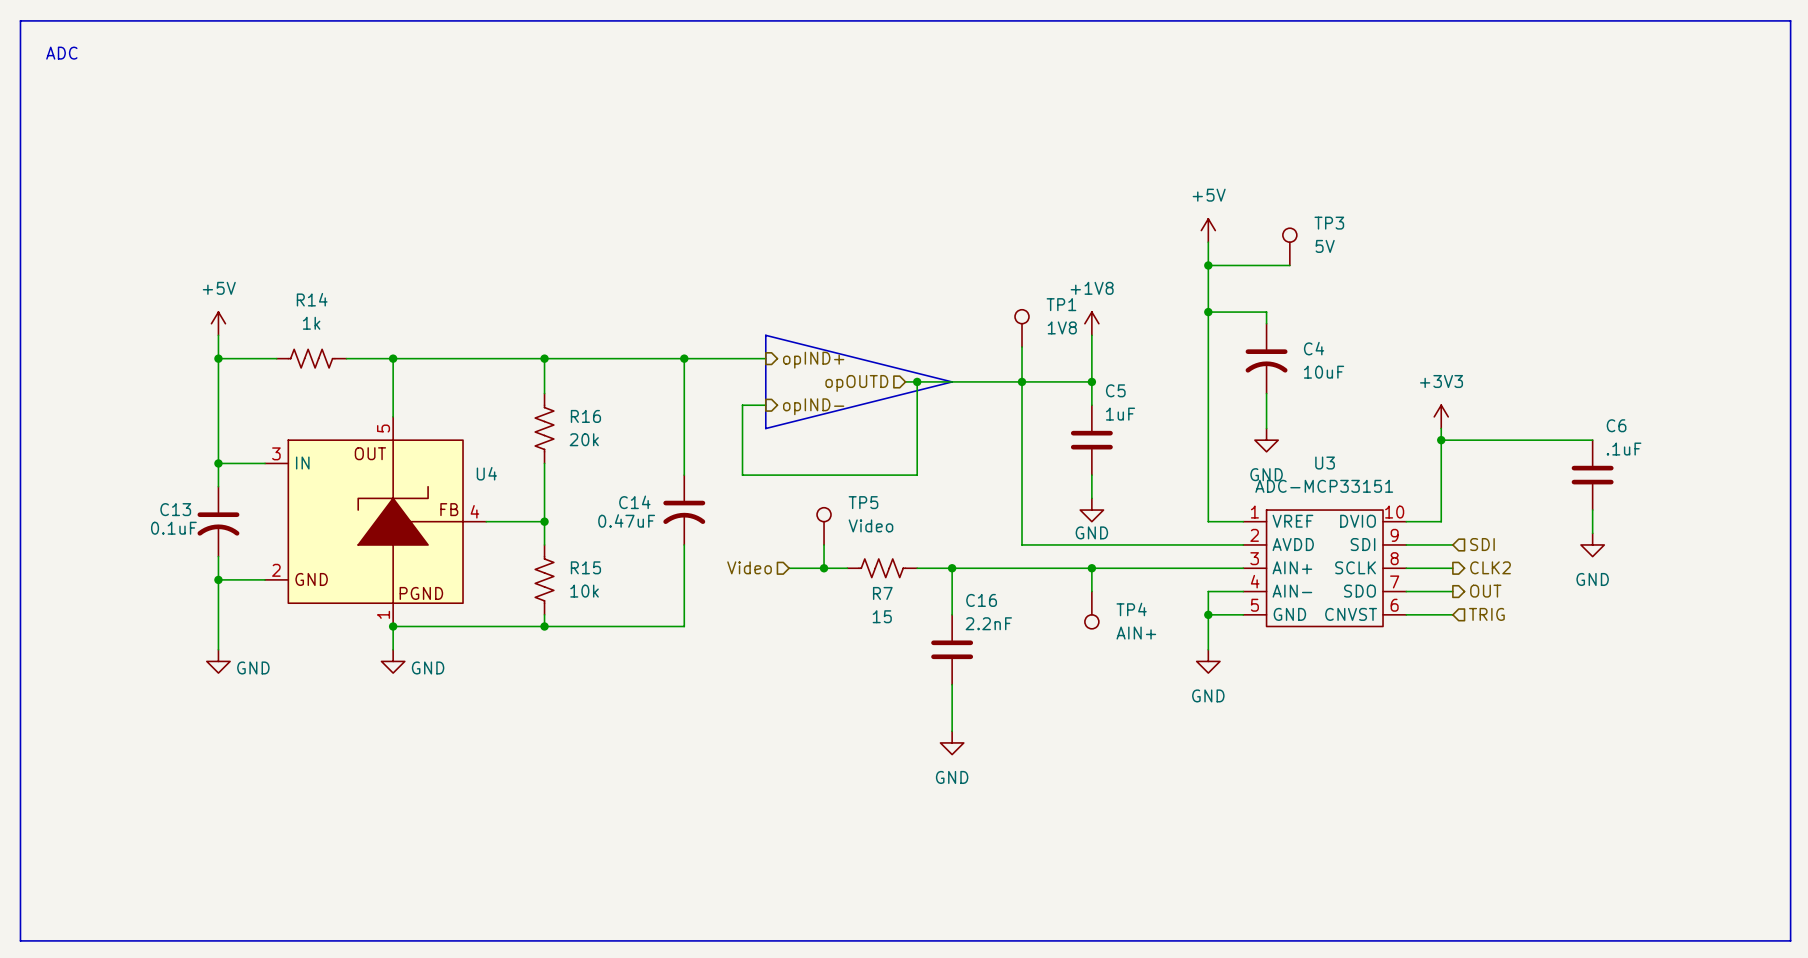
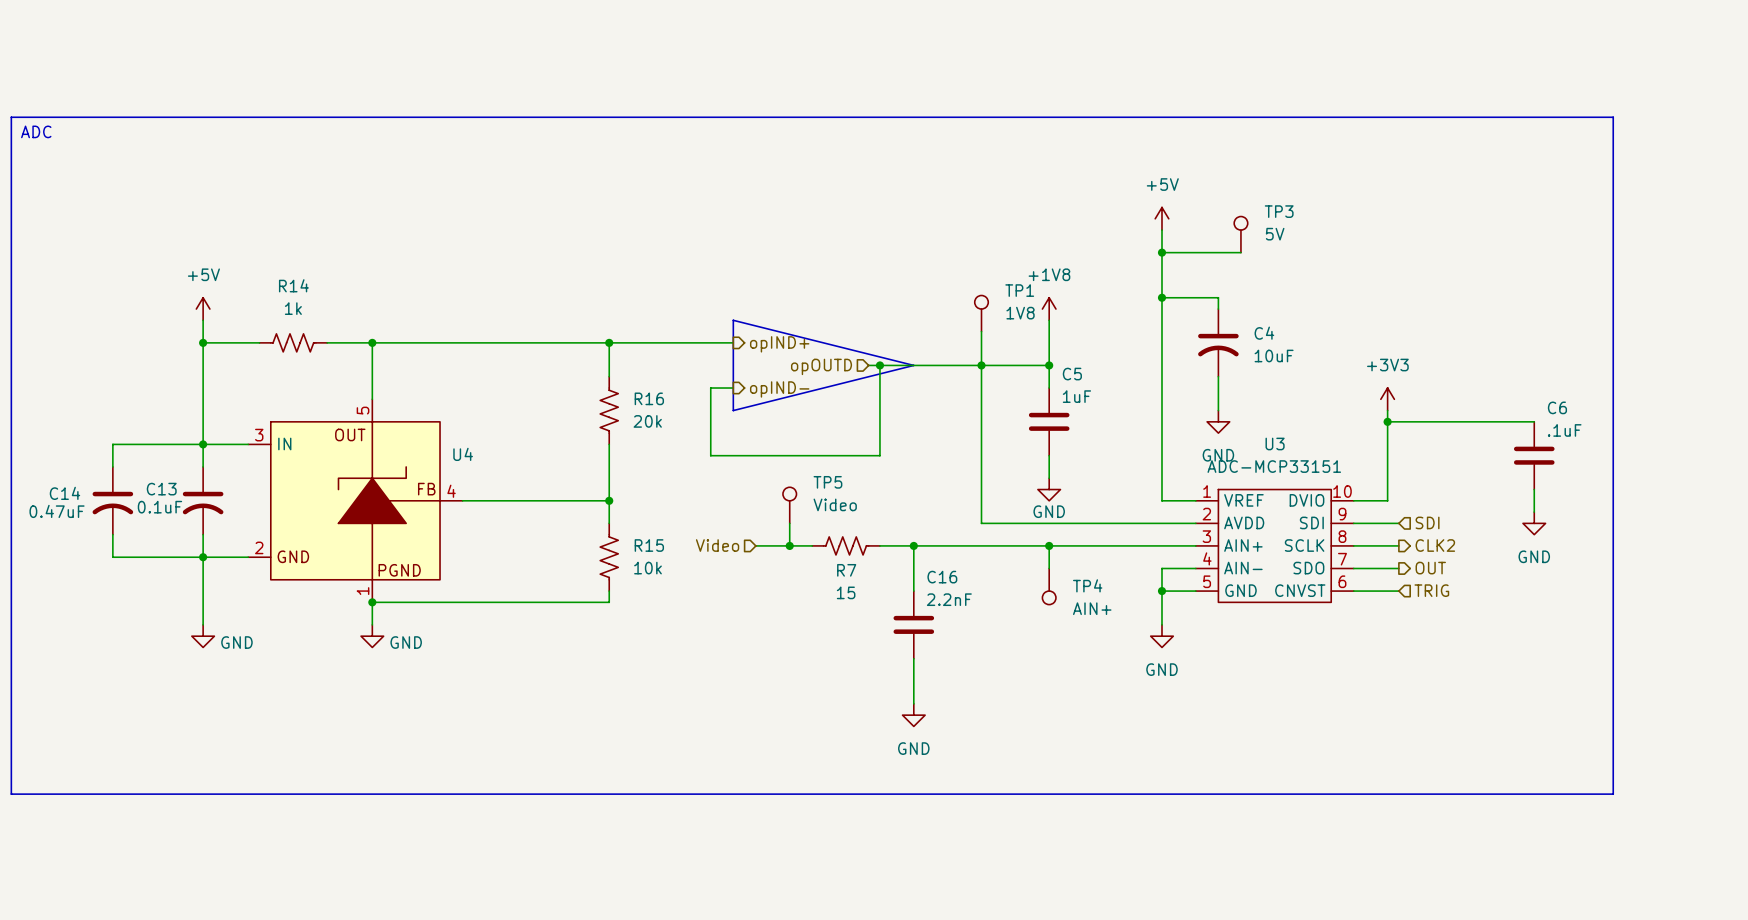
text position: ADC (61, 53) -> ADC (36, 131)
line: (20, 125) (20, 20) (1790, 20) (1790, 940) (20, 940) (20, 824) -> (11, 117) (1613, 117) (1613, 794) (11, 794)
wire: (544, 358) (544, 393) -> (609, 342) (609, 376)
junction: (544, 358) -> none
junction: none -> (609, 342)
wire: (684, 358) (684, 475) -> none
junction: (684, 358) -> none
R16 position: (544, 428) -> (609, 410)
wire: none -> (203, 444) (112, 444) (112, 466)
wire: (544, 463) (544, 544) -> (609, 444) (609, 523)
C14 position: (684, 510) -> (112, 500)
wire: none -> (518, 500) (609, 500)
junction: (544, 521) -> none
junction: none -> (609, 500)
wire: (684, 544) (684, 626) (637, 626) -> (609, 591) (609, 602)
wire: none -> (112, 534) (112, 557) (203, 557)
R15 position: (544, 579) -> (609, 557)
wire: (544, 614) (544, 626) -> none
junction: (544, 626) -> none

